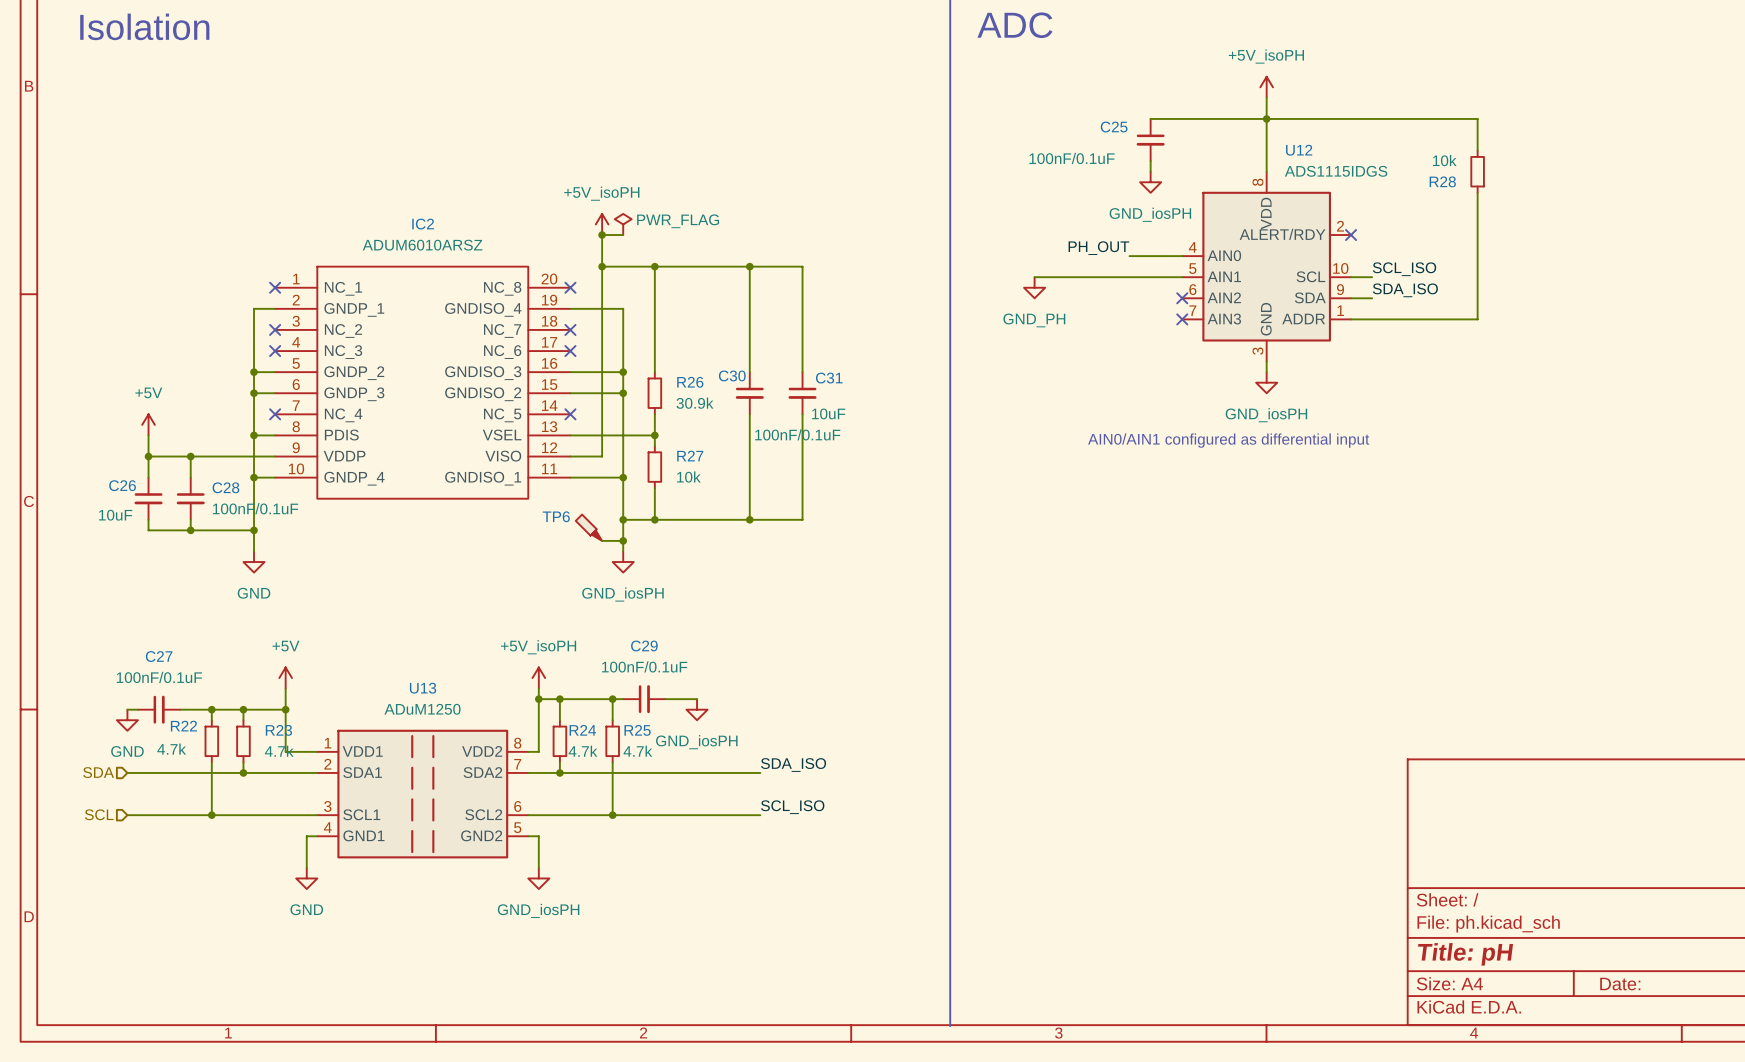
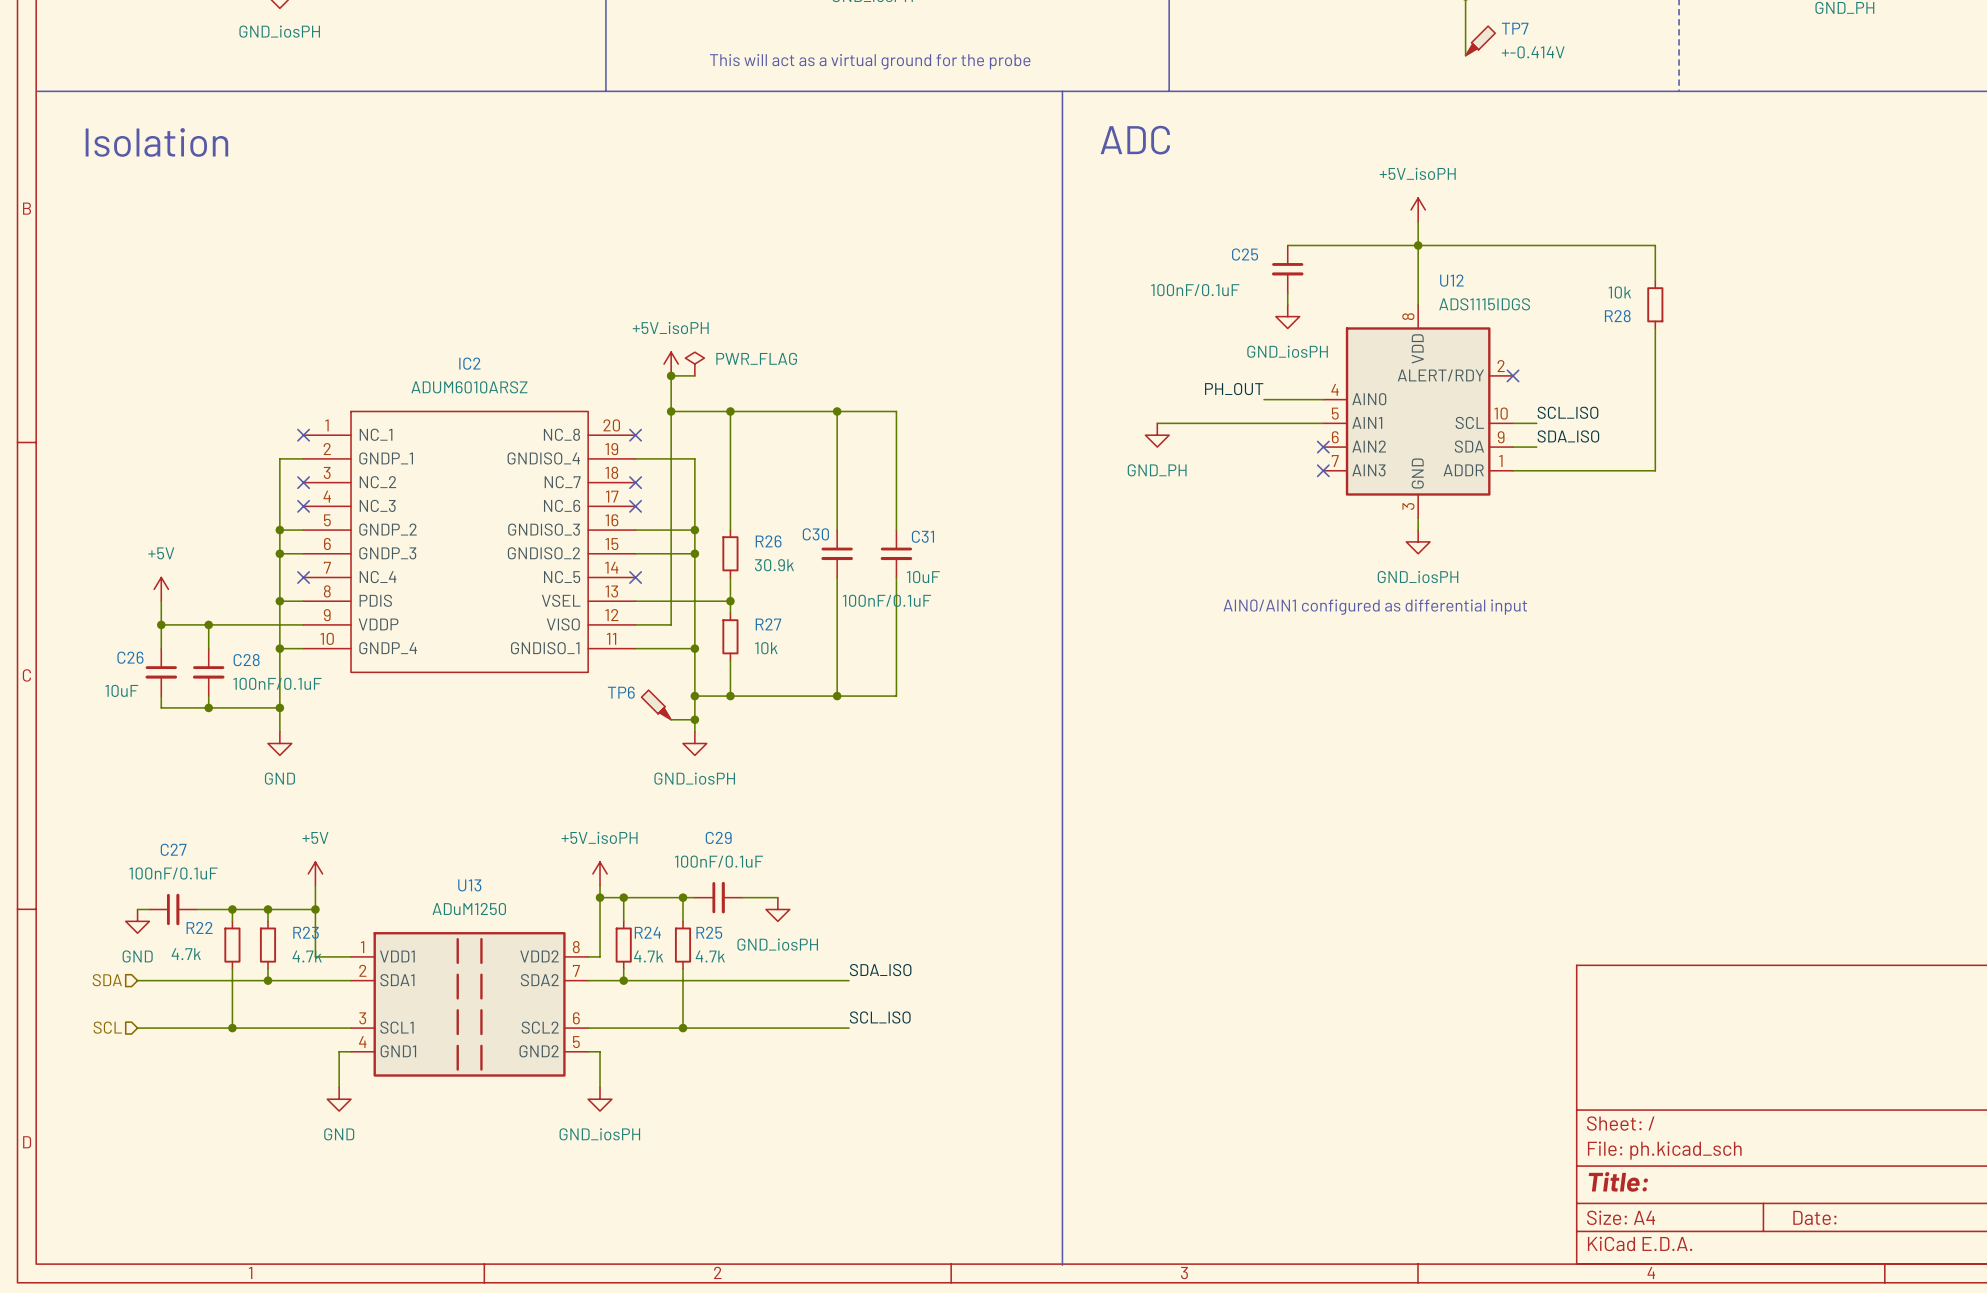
title block: Title: pH (1465, 954) -> Title: (1618, 1181)

